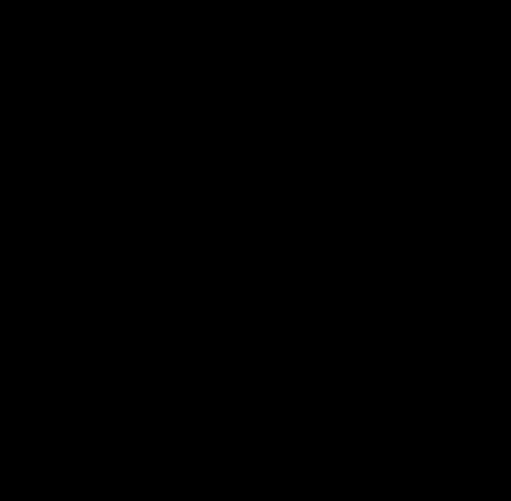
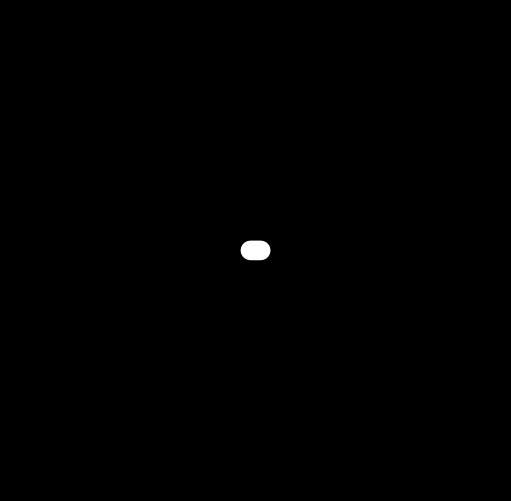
board edge: none -> (250, 250) (260, 250)

